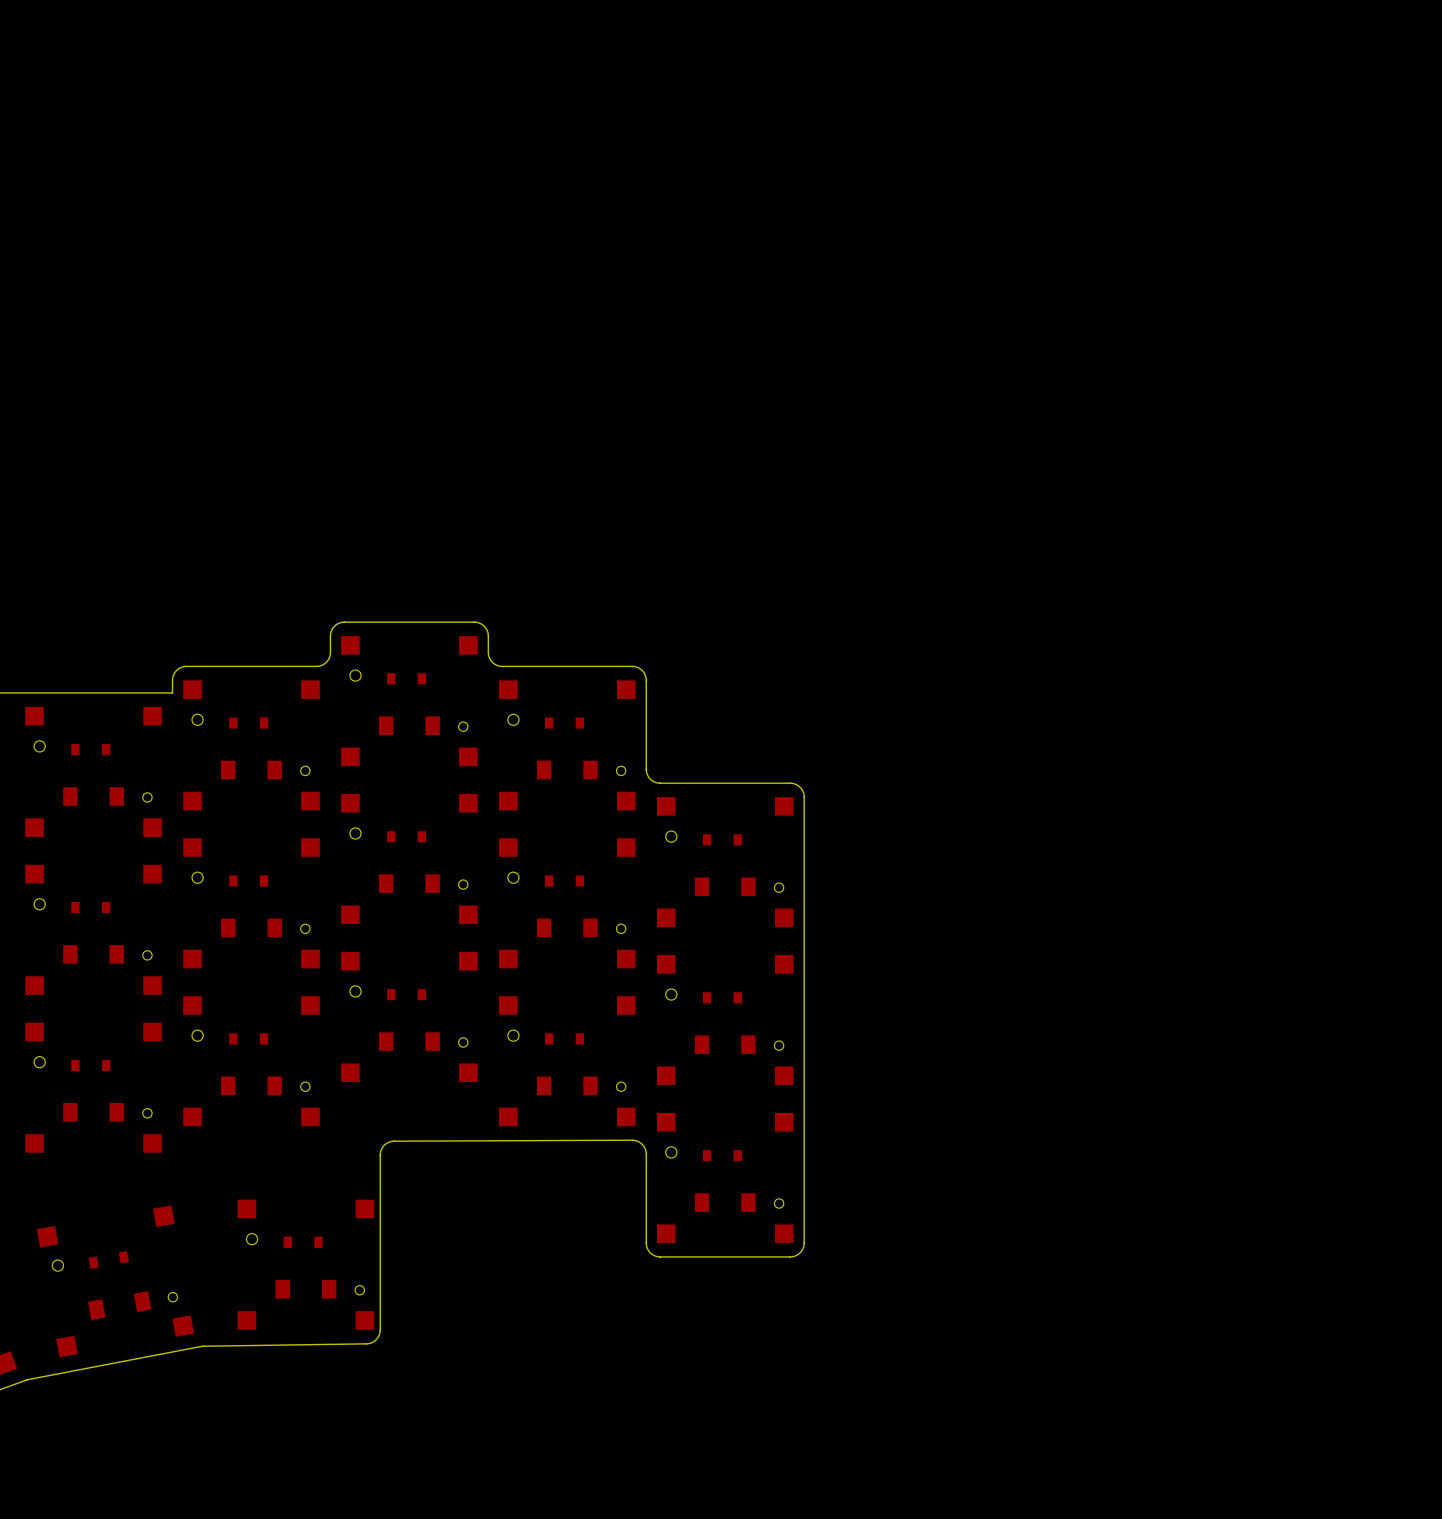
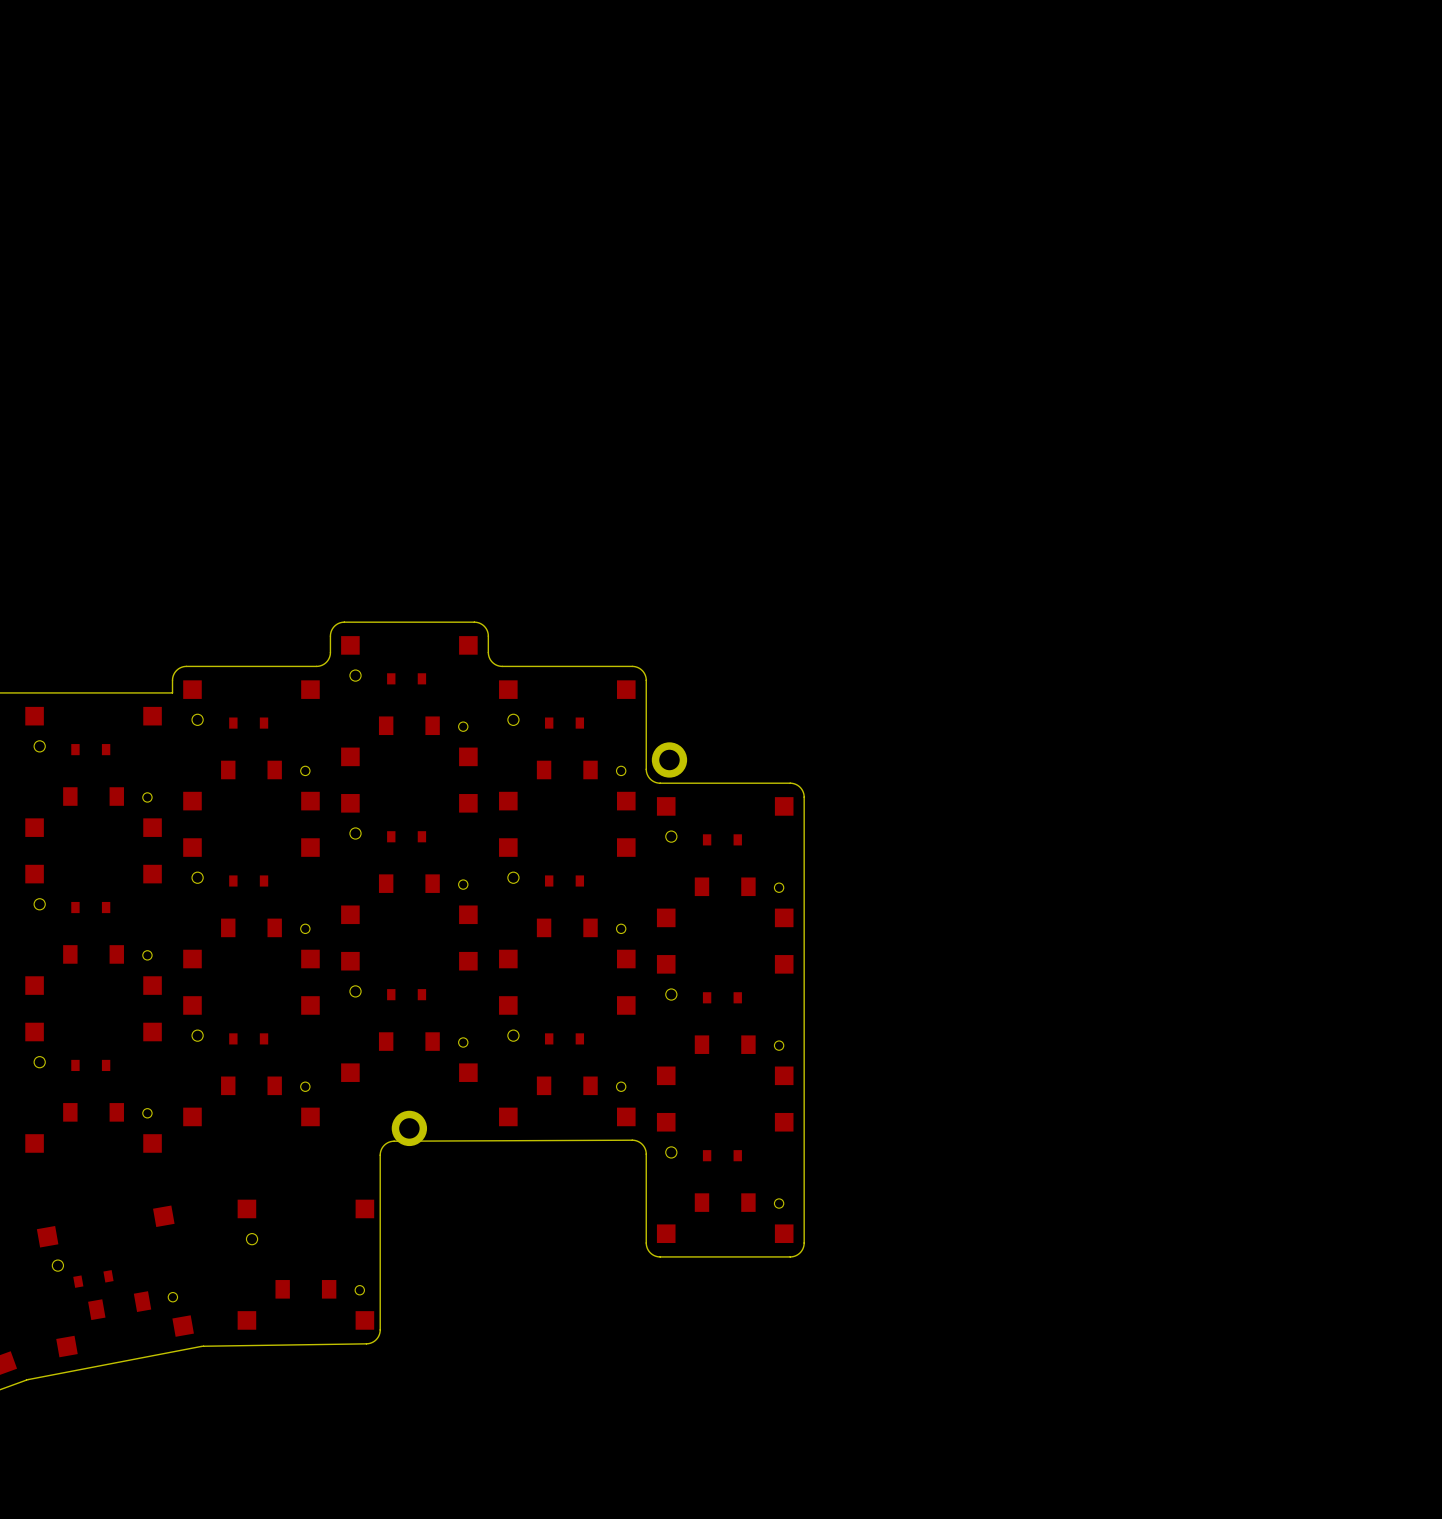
part: none -> (669, 759)
part: none -> (409, 1128)
part: (303, 1242) -> none
part position: (108, 1259) -> (93, 1278)

